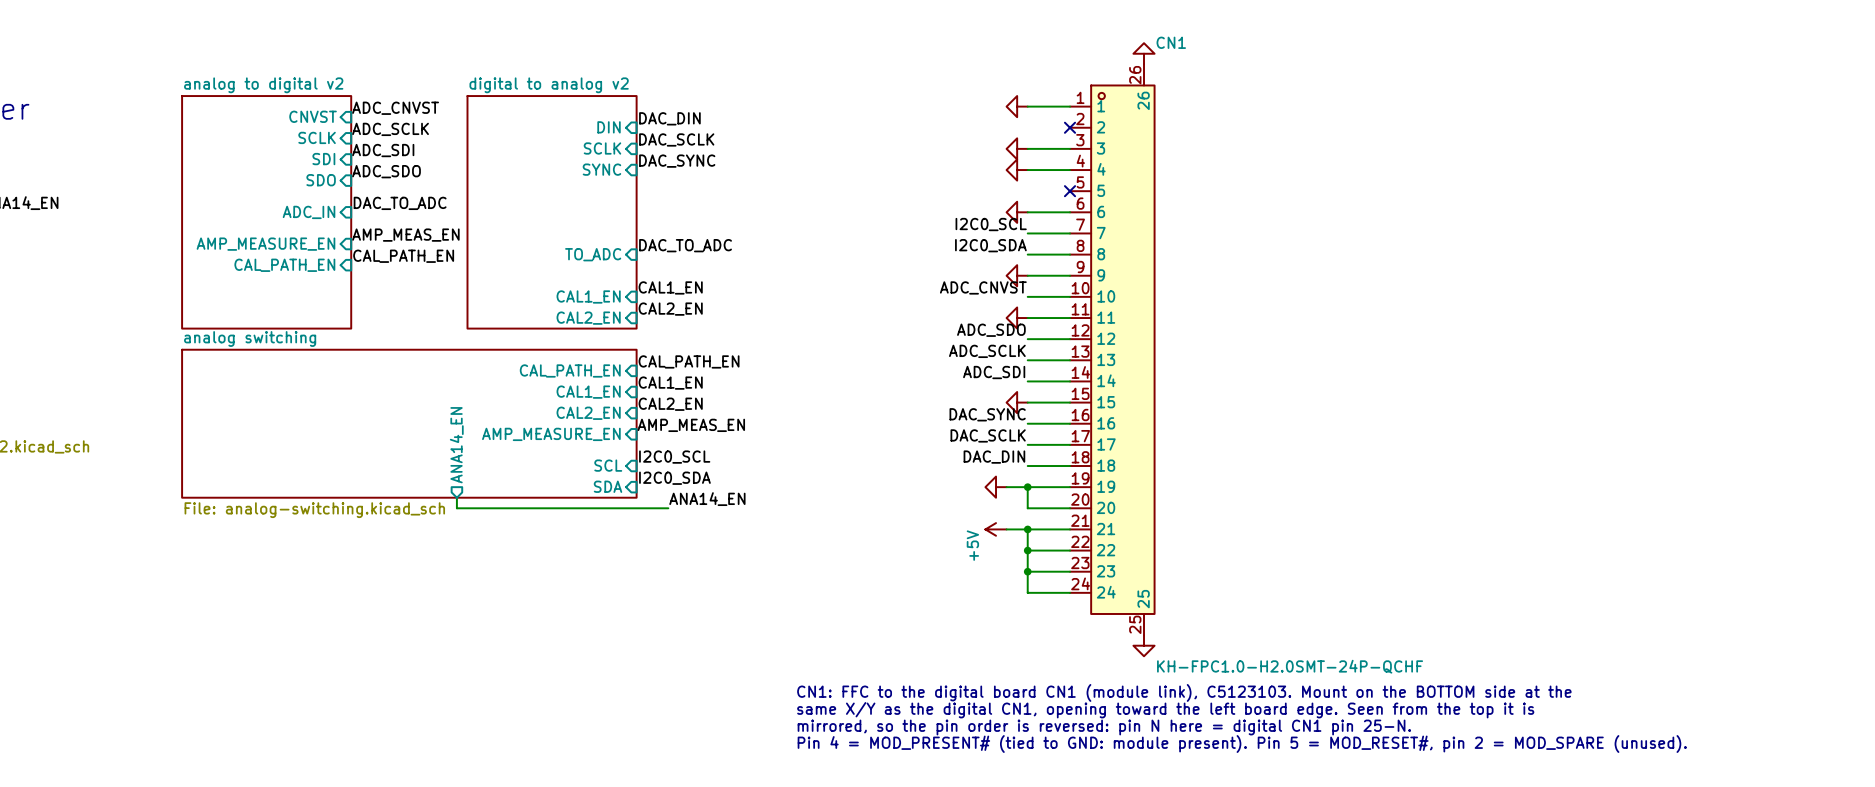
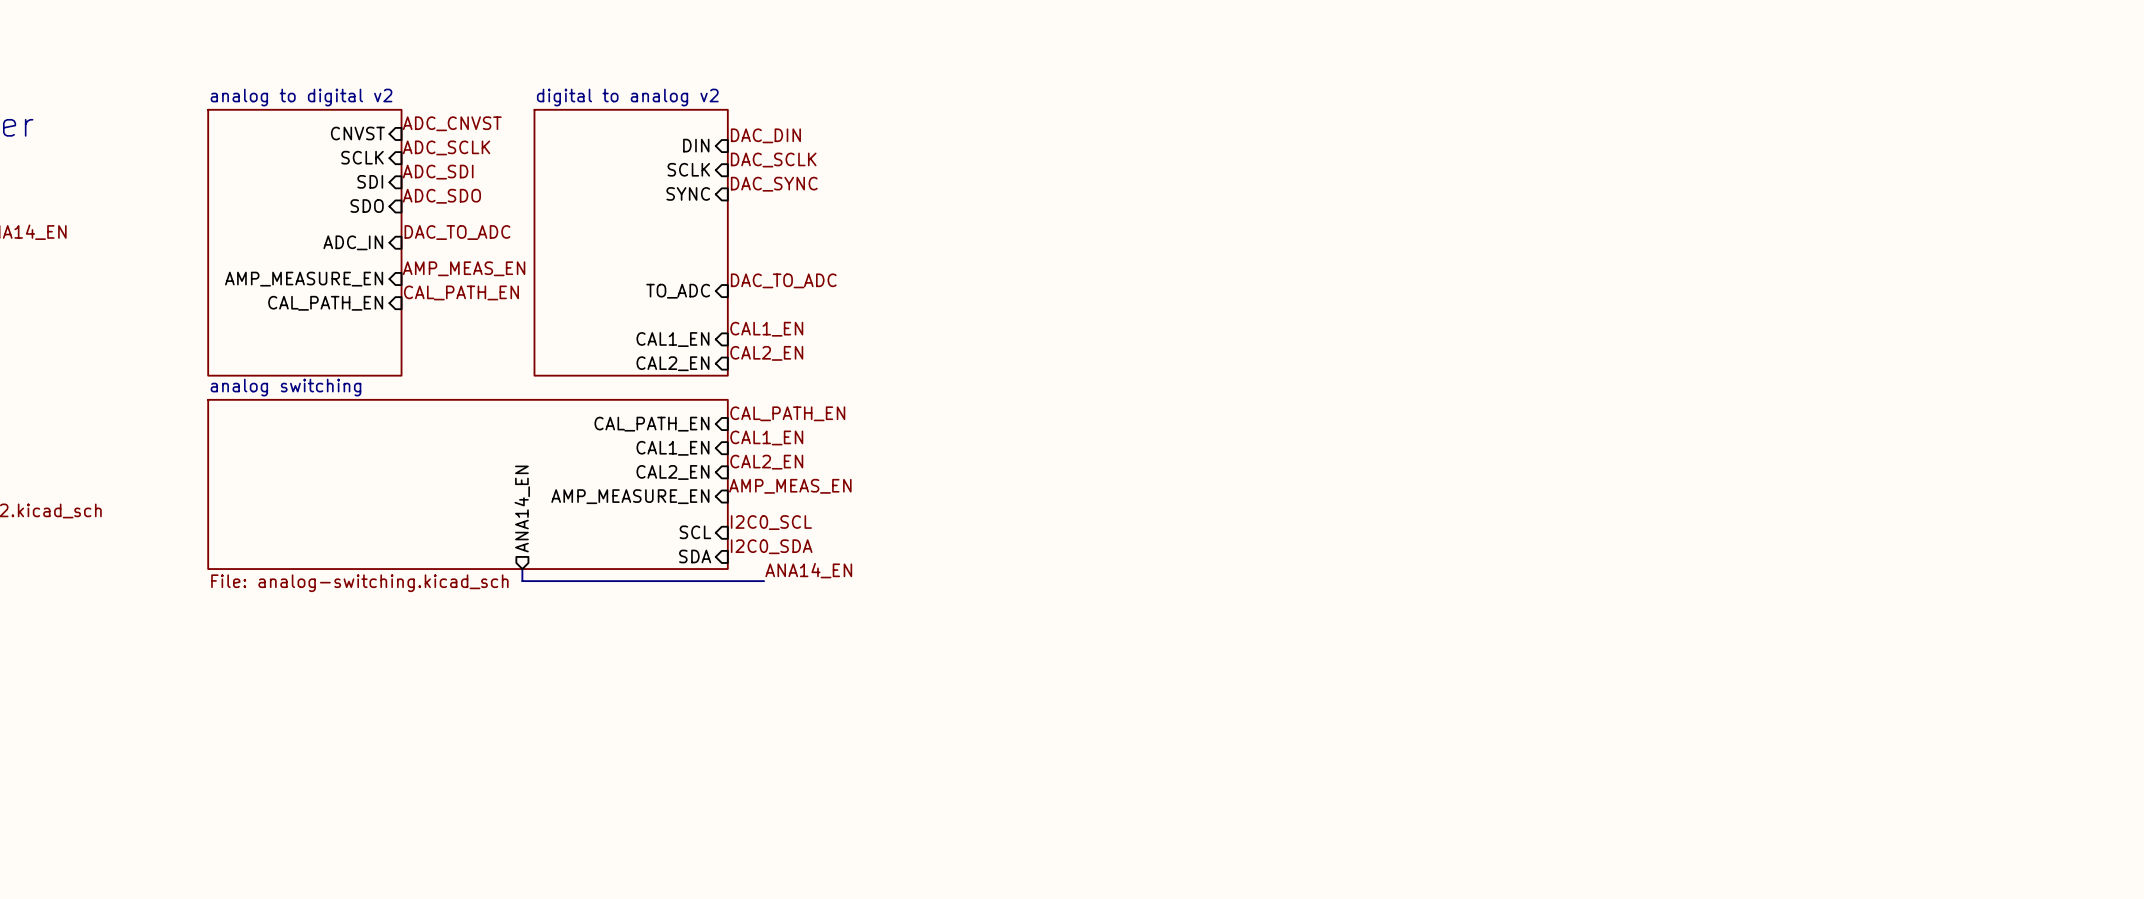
power symbol: (1144, 53) -> none
power symbol: (1017, 106) -> none
wire: (1027, 106) (1070, 106) -> none
no-connect mark: (1070, 127) -> none
power symbol: (1017, 148) -> none
wire: (1027, 148) (1070, 148) -> none
power symbol: (1017, 170) -> none
wire: (1027, 170) (1070, 170) -> none
no-connect mark: (1070, 191) -> none
power symbol: (1017, 212) -> none
wire: (1027, 212) (1070, 212) -> none
label: I2C0_SCL (991, 224) -> none
wire: (1027, 233) (1070, 233) -> none
label: I2C0_SDA (990, 245) -> none
wire: (1027, 254) (1070, 254) -> none
power symbol: (1017, 275) -> none
wire: (1027, 275) (1070, 275) -> none
label: ADC_CNVST (983, 287) -> none
wire: (1027, 296) (1070, 296) -> none
power symbol: (1017, 318) -> none
wire: (1027, 318) (1070, 318) -> none
label: ADC_SDO (991, 330) -> none
wire: (1027, 339) (1070, 339) -> none
CN1: KH-FPC1.0-H2.0SMT-24P-QCHF (1112, 349) -> none
label: ADC_SCLK (987, 351) -> none
wire: (1027, 360) (1070, 360) -> none
label: ADC_SDI (994, 372) -> none
wire: (1027, 381) (1070, 381) -> none
power symbol: (1017, 402) -> none
wire: (1027, 402) (1070, 402) -> none
label: DAC_SYNC (987, 414) -> none
wire: (1027, 423) (1070, 423) -> none
label: DAC_SCLK (988, 435) -> none
wire: (1027, 444) (1070, 444) -> none
label: DAC_DIN (994, 457) -> none
wire: (1027, 466) (1070, 466) -> none
power symbol: (996, 487) -> none
wire: (1006, 487) (1070, 487) -> none
wire: (1027, 487) (1027, 508) (1070, 508) -> none
junction: (1027, 487) -> none
power symbol: +5V (996, 529) -> none
wire: (1006, 529) (1070, 529) -> none
wire: (1027, 529) (1027, 592) (1070, 592) -> none
junction: (1027, 529) -> none
wire: (1027, 550) (1070, 550) -> none
junction: (1027, 550) -> none
wire: (1027, 571) (1070, 571) -> none
junction: (1027, 571) -> none
power symbol: (1144, 645) -> none
text: CN1: FFC to the digital board CN1 (module link), C5123103. Mount on the BOTTOM side at the (1184, 692) -> none
text: same X/Y as the digital CN1, opening toward the left board edge. Seen from the top it is (1165, 710) -> none
text: mirrored, so the pin order is reversed: pin N here = digital CN1 pin 25-N. (1104, 727) -> none
text: Pin 4 = MOD_PRESENT# (tied to GND: module present). Pin 5 = MOD_RESET#, pin 2 = MOD_SPARE (unused). (1242, 744) -> none

